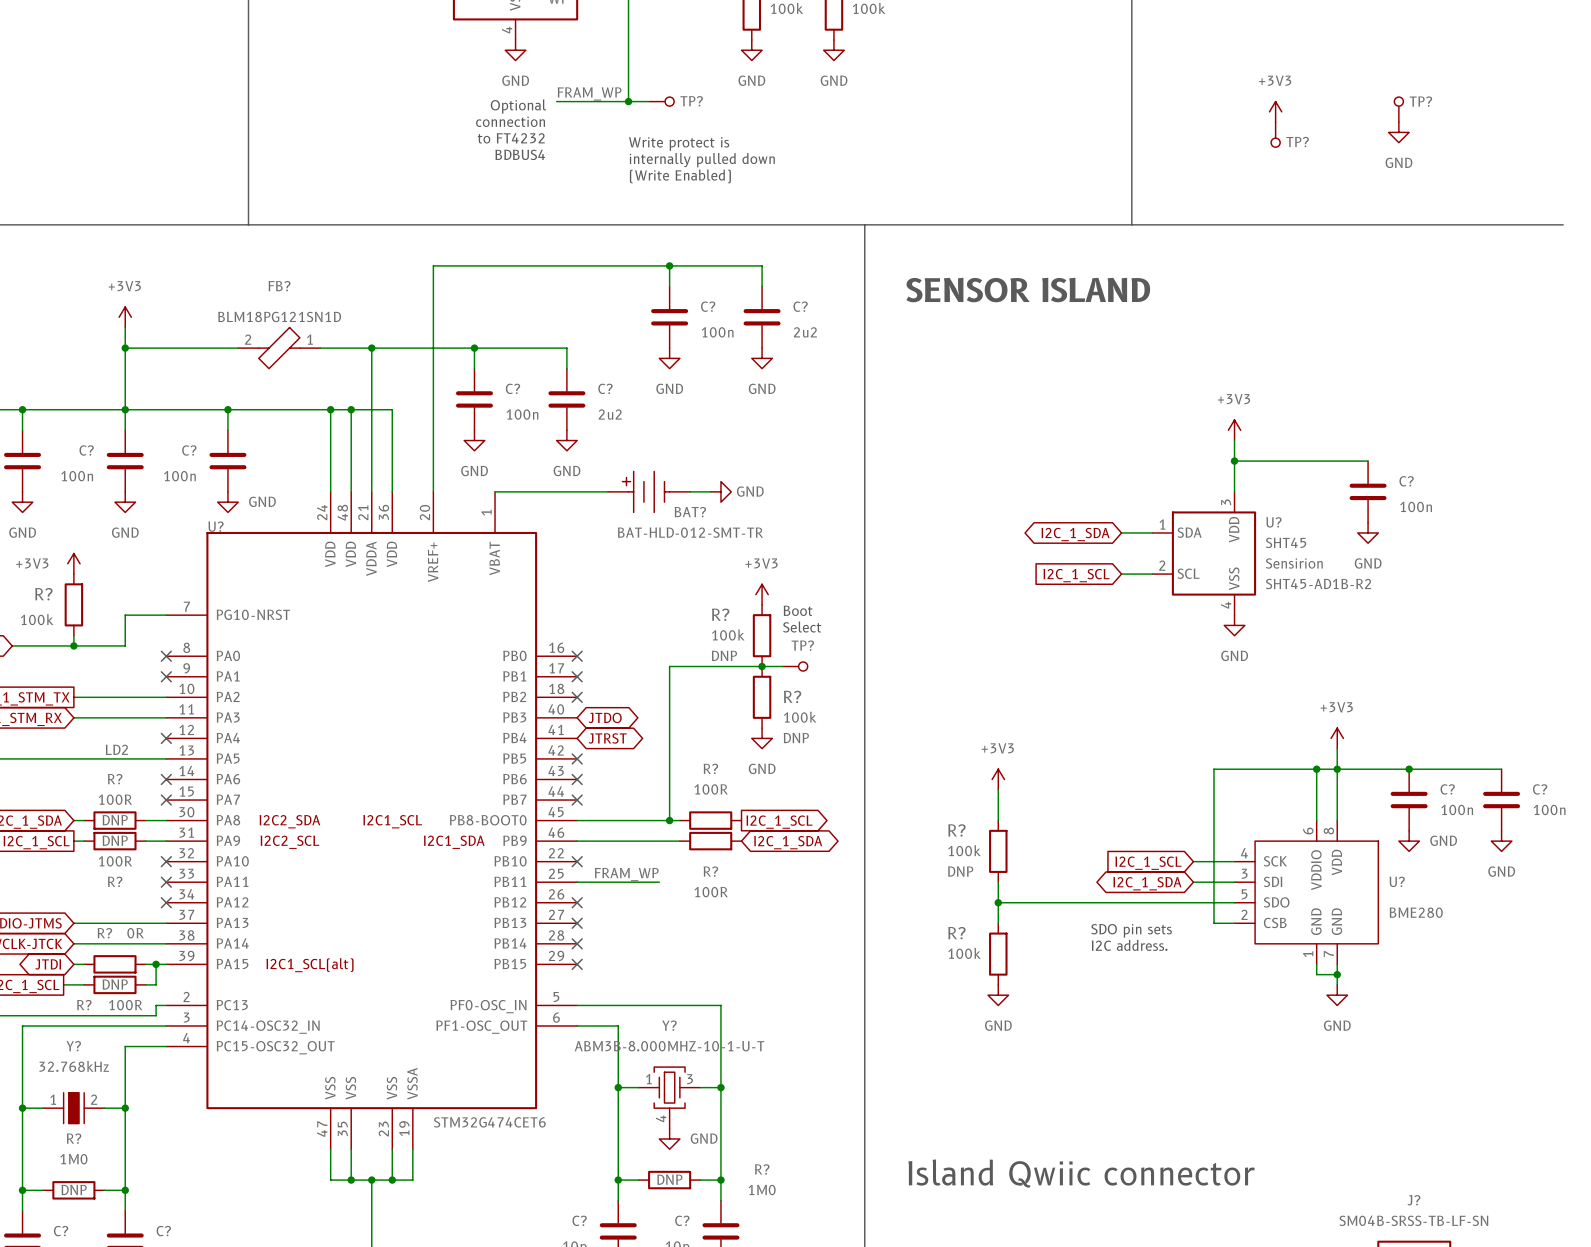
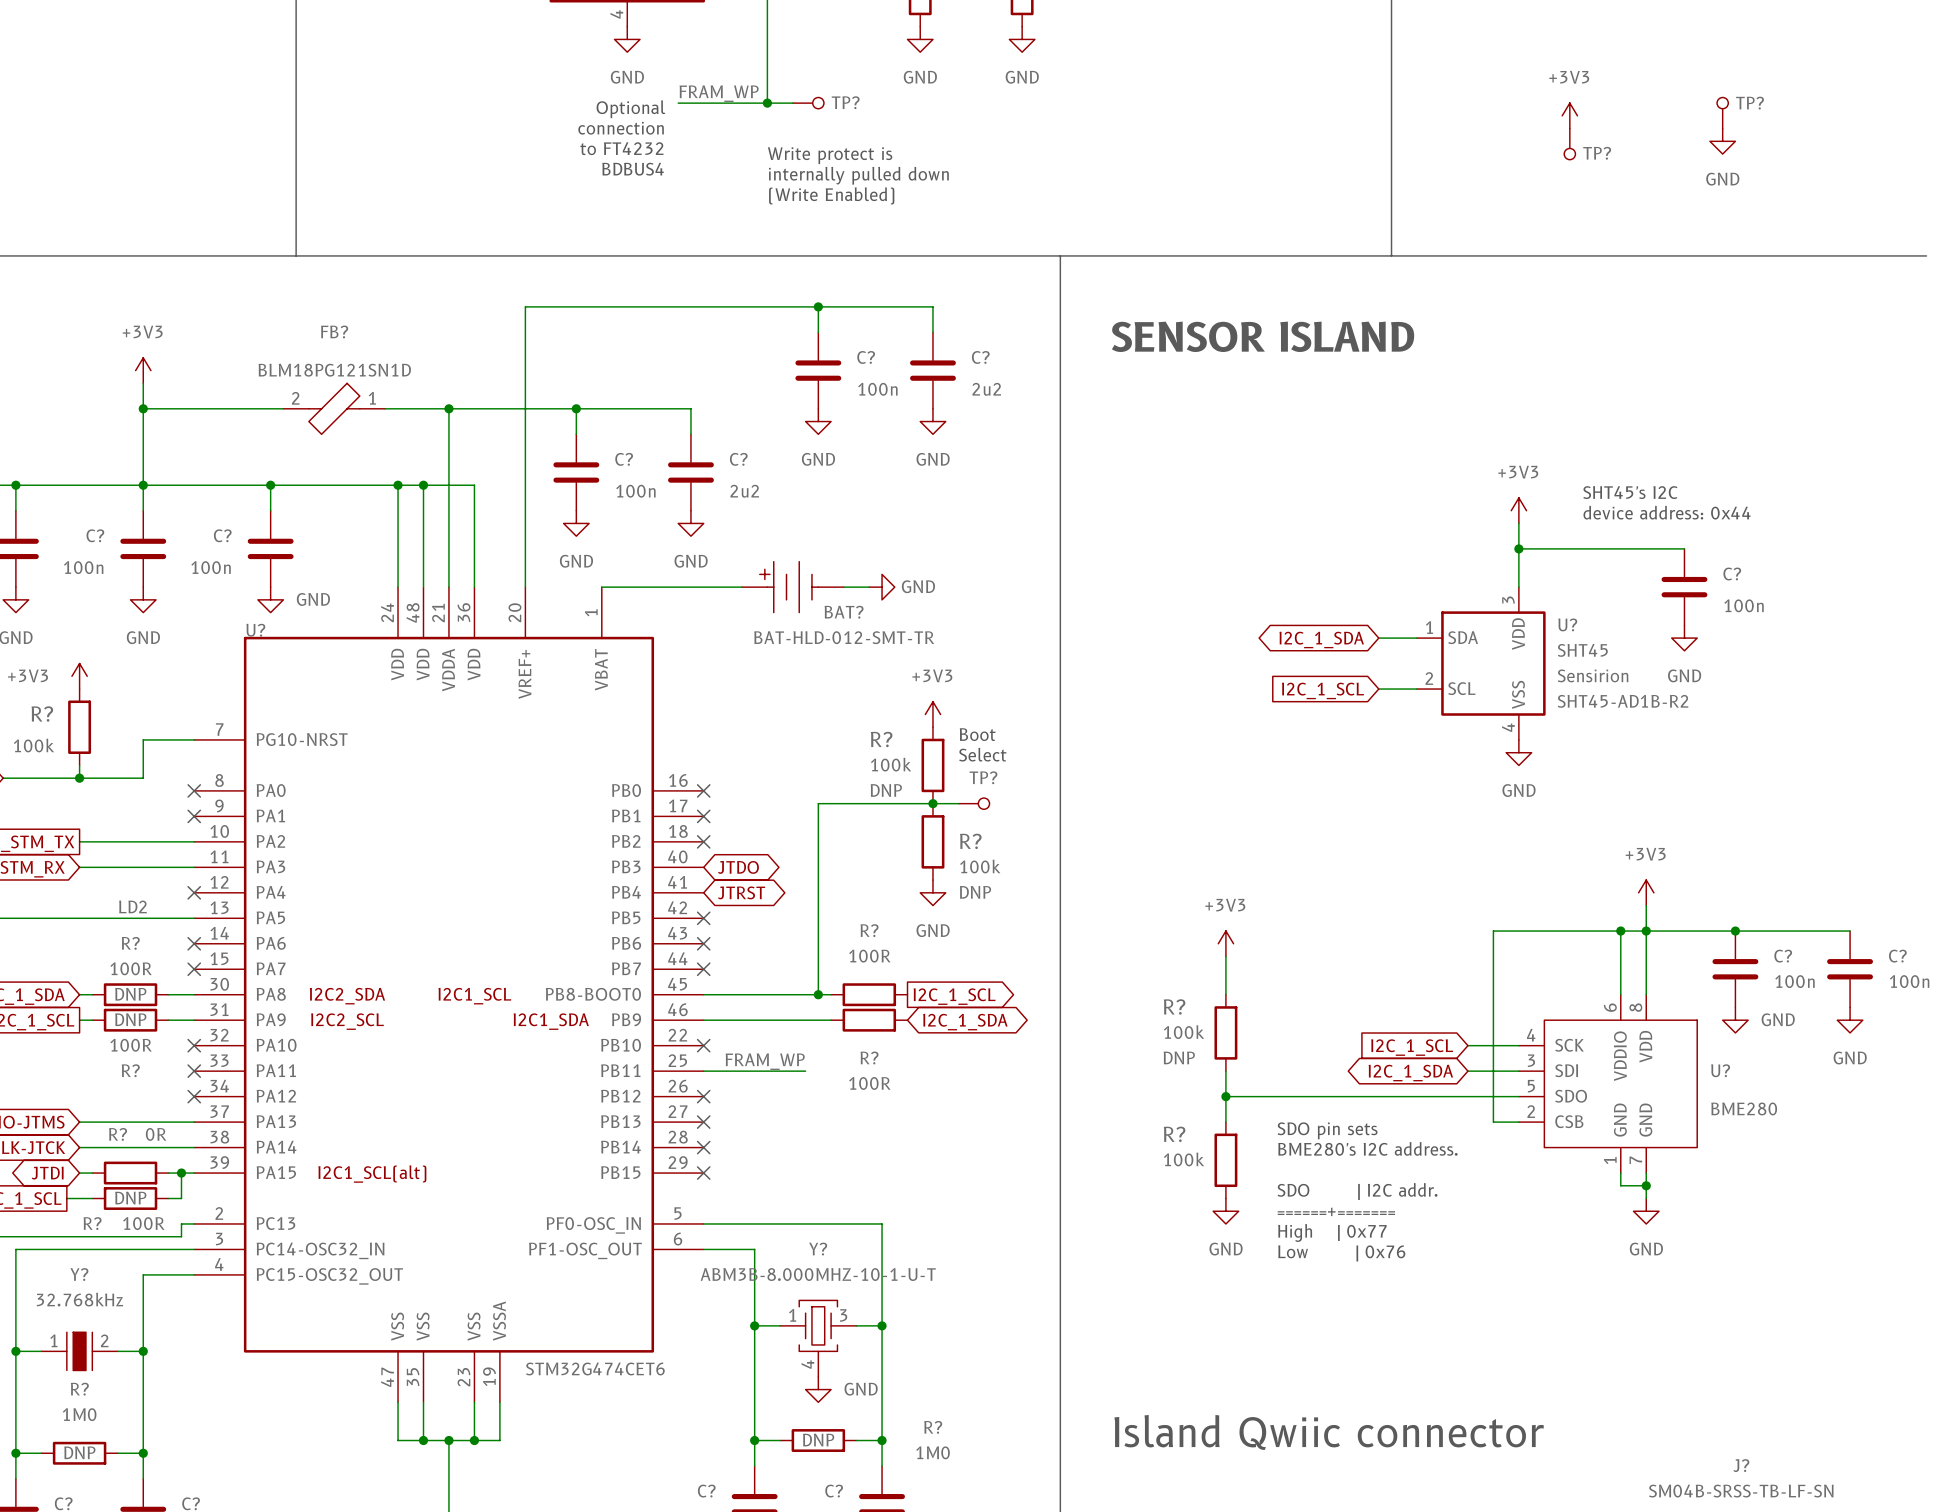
text: none -> SHT45's I2C (1630, 492)
text: none -> device address: 0x44 (1667, 512)
text position: SDO pin sets (1131, 930) -> SDO pin sets (1327, 1130)
text: I2C address. (1129, 945) -> BME280's I2C address. (1367, 1148)
text: none -> SDO | I2C addr. (1357, 1191)
text: none -> ======+======= (1336, 1211)
text: none -> High | 0x77 (1332, 1233)
text: none -> Low | 0x76 (1341, 1253)

